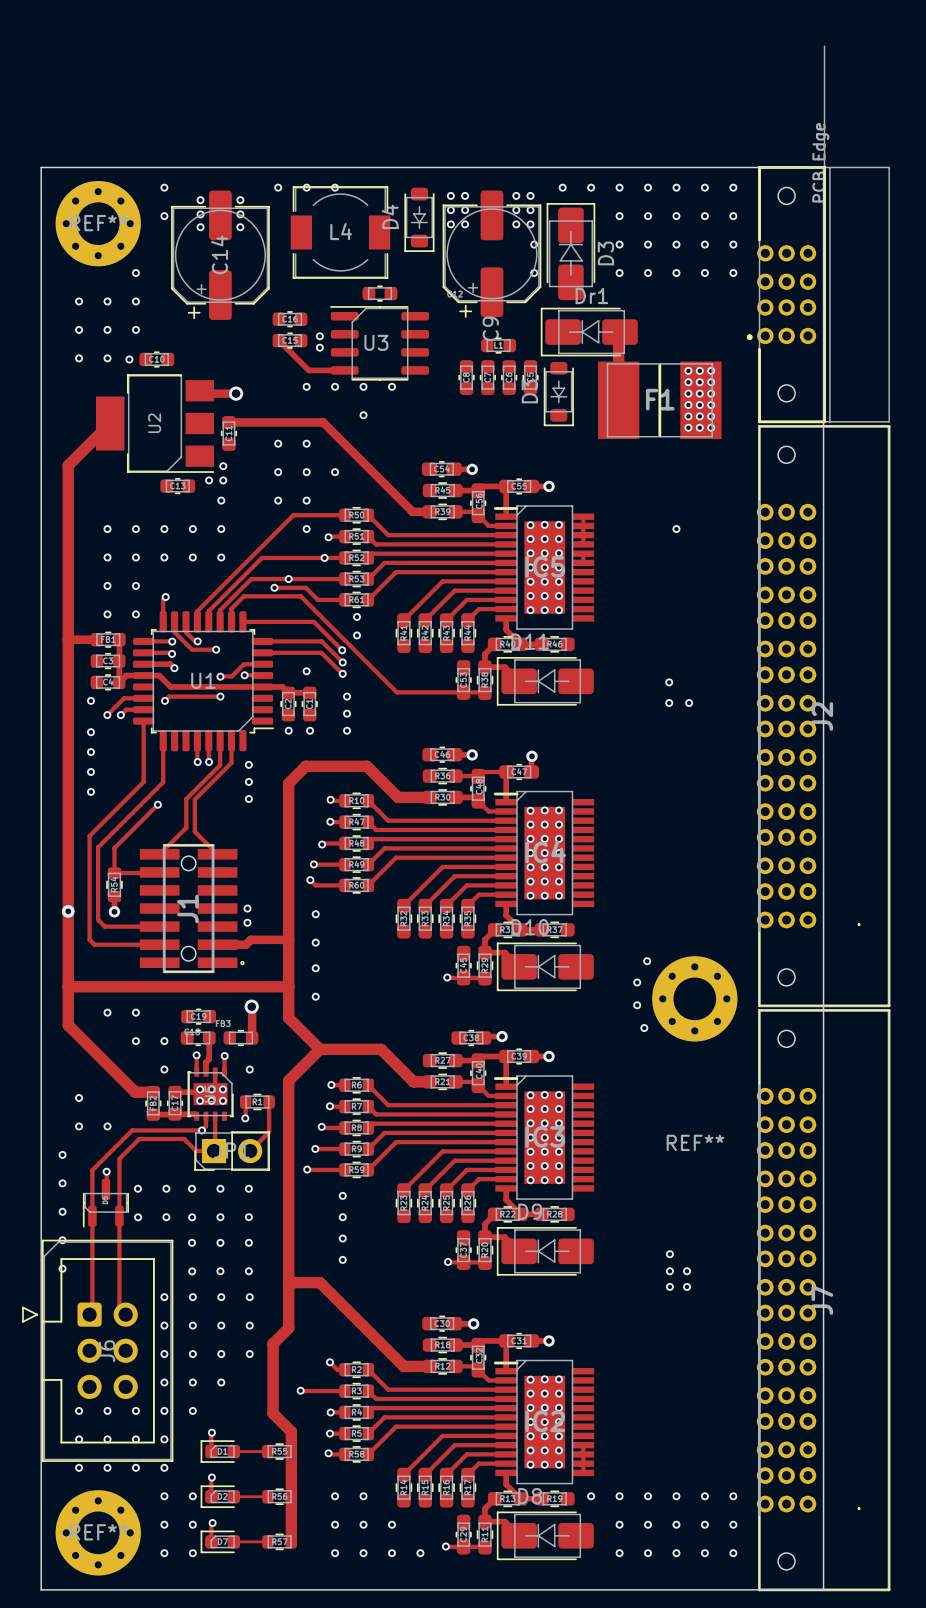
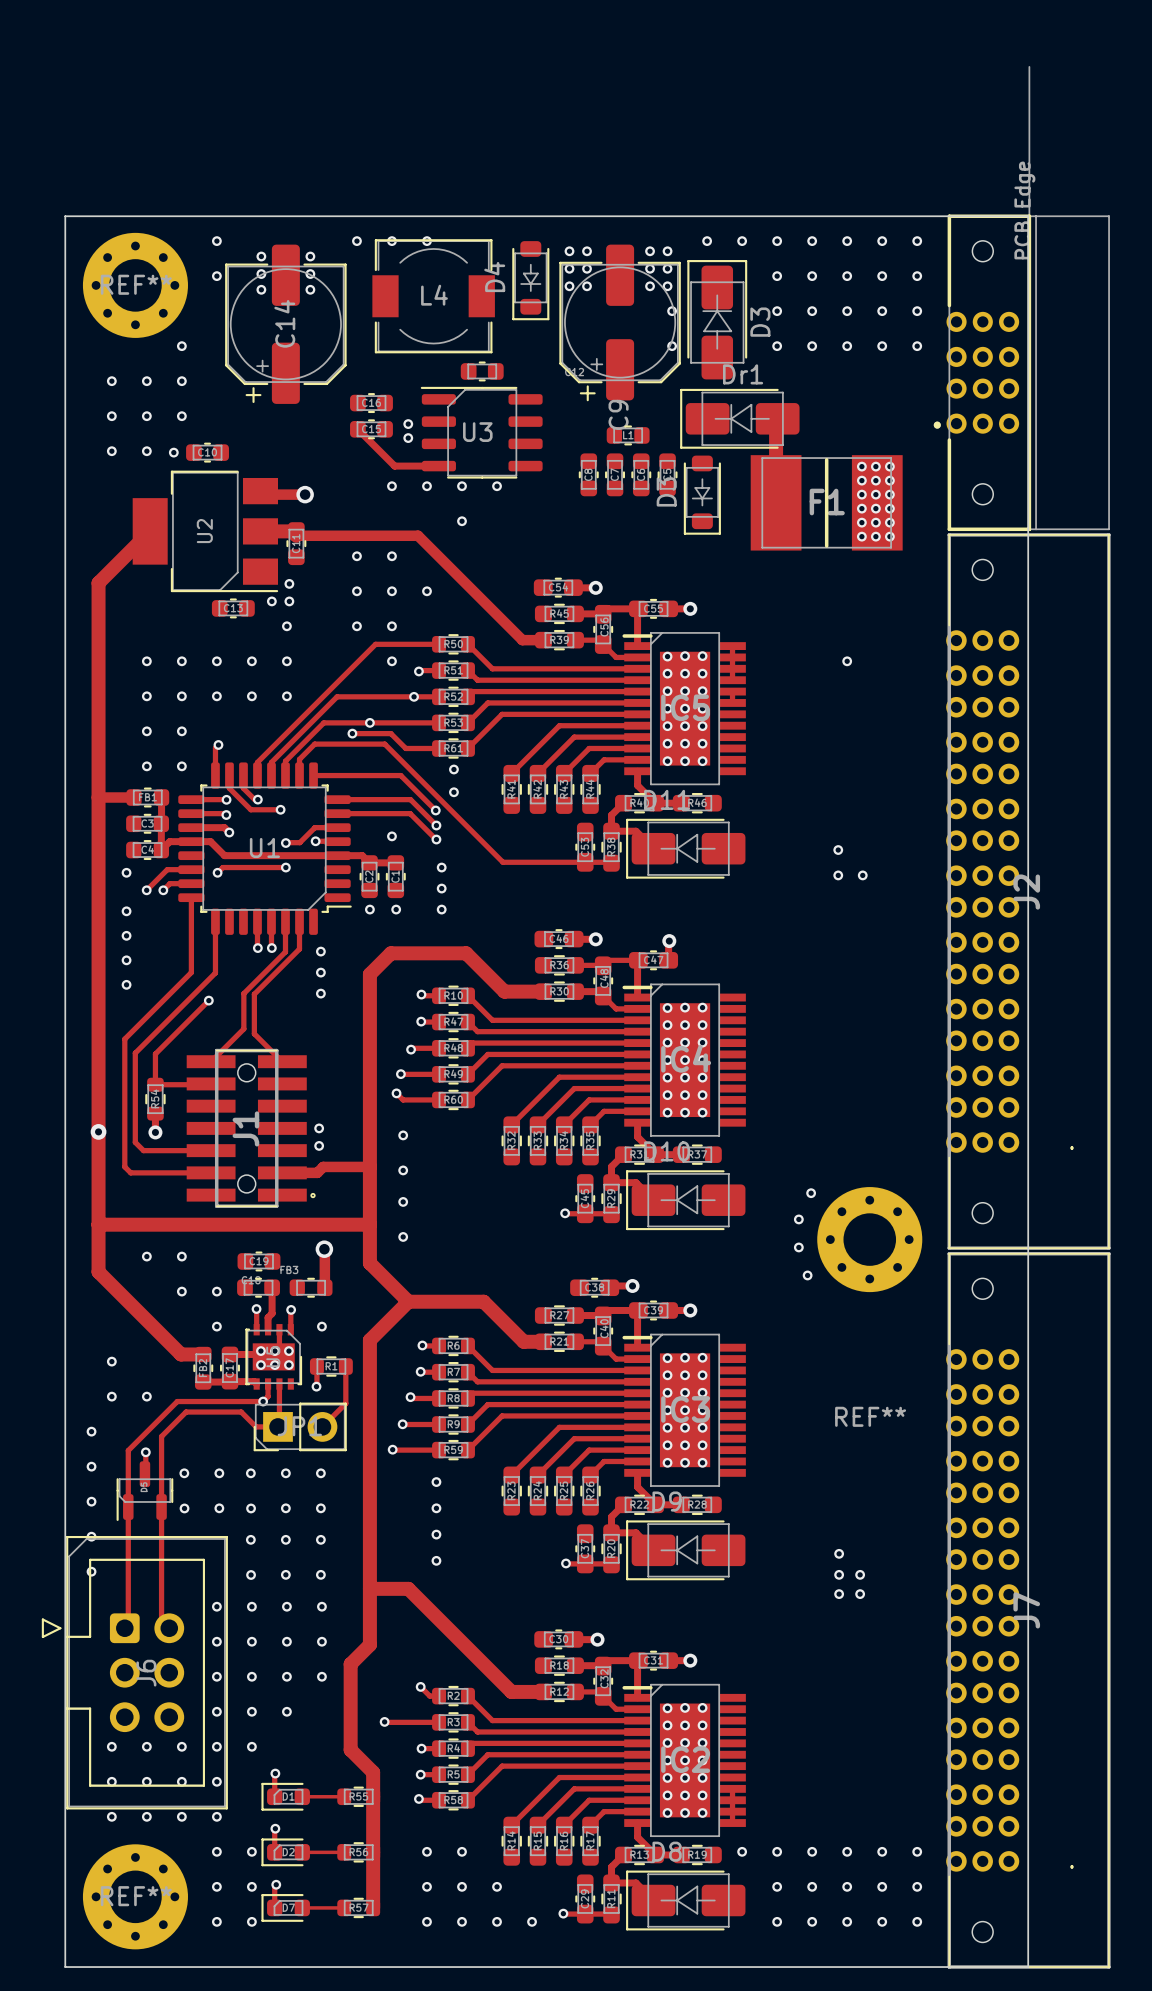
track: (228, 422) (322, 422) (327, 427) -> (260, 531) (292, 531) (296, 535) (418, 535)

